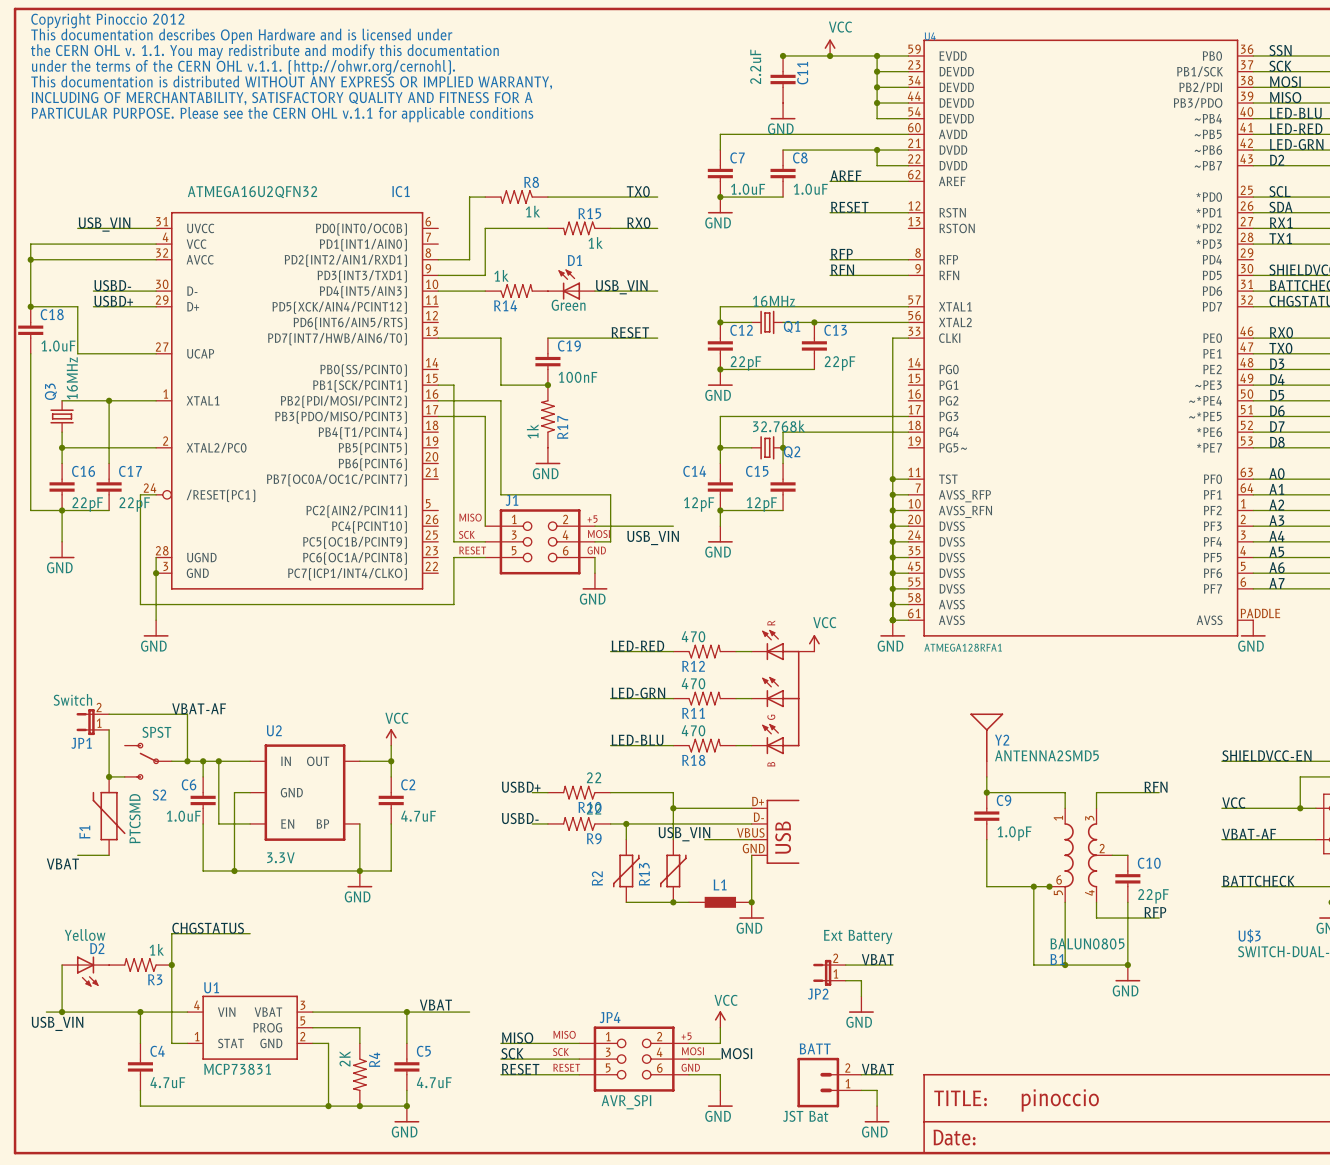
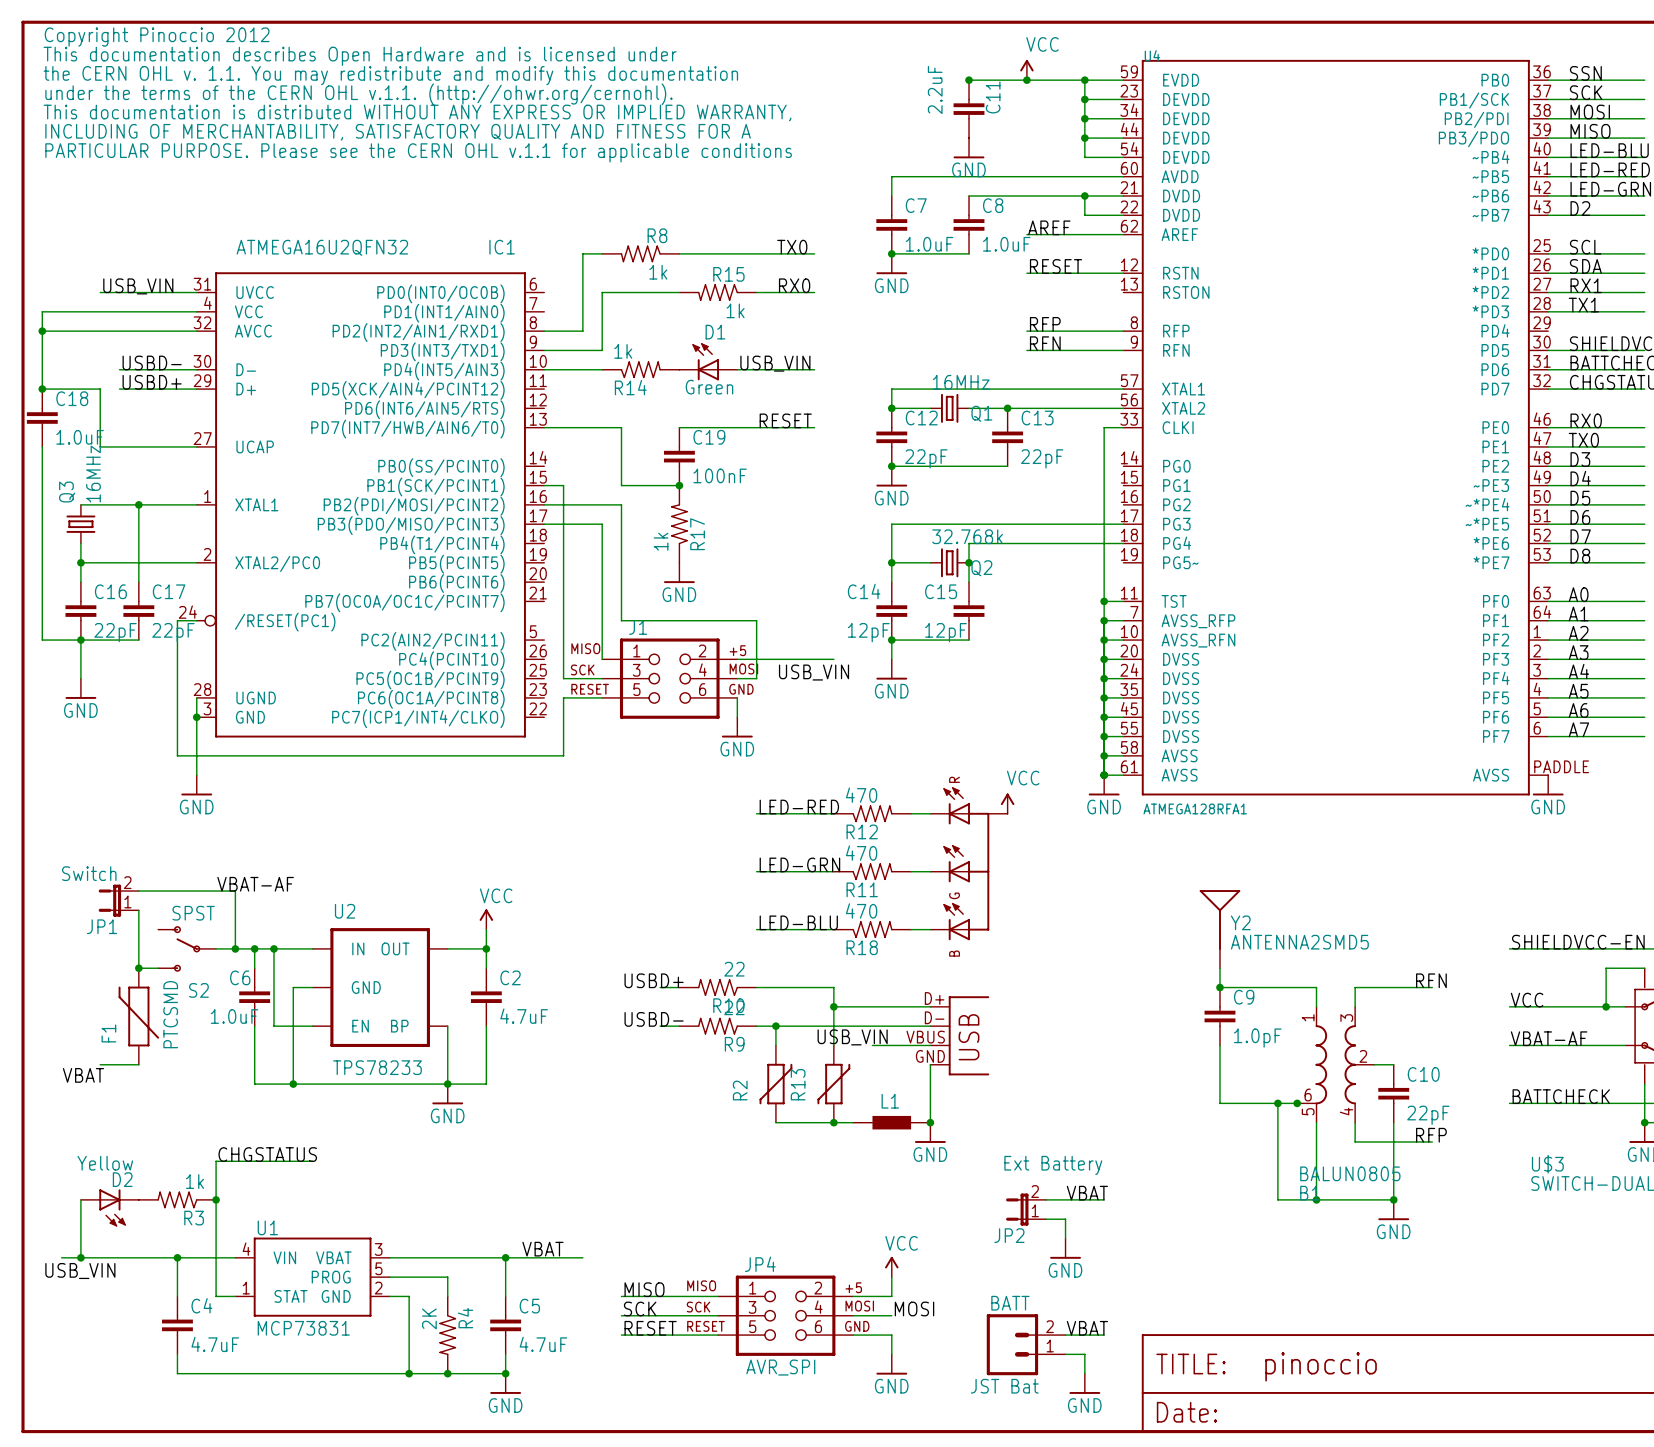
U2 value: 3.3V (280, 857) -> TPS78233 (377, 1067)

